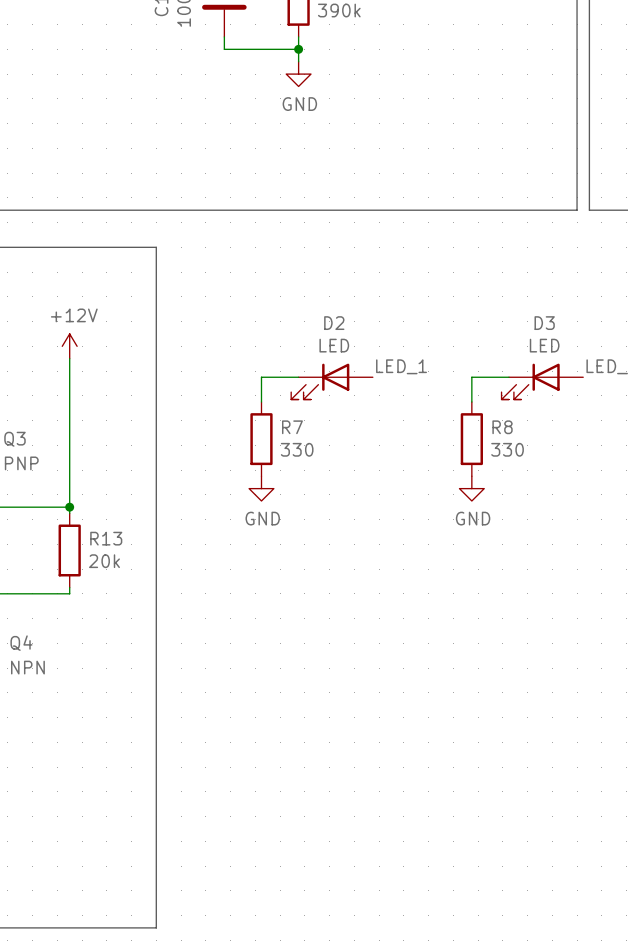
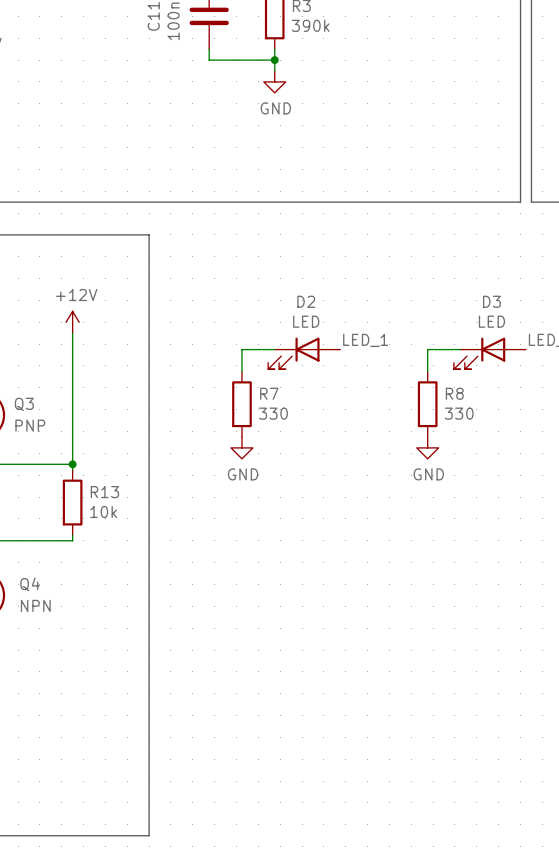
R13 value: 20k (104, 561) -> 10k (103, 511)

